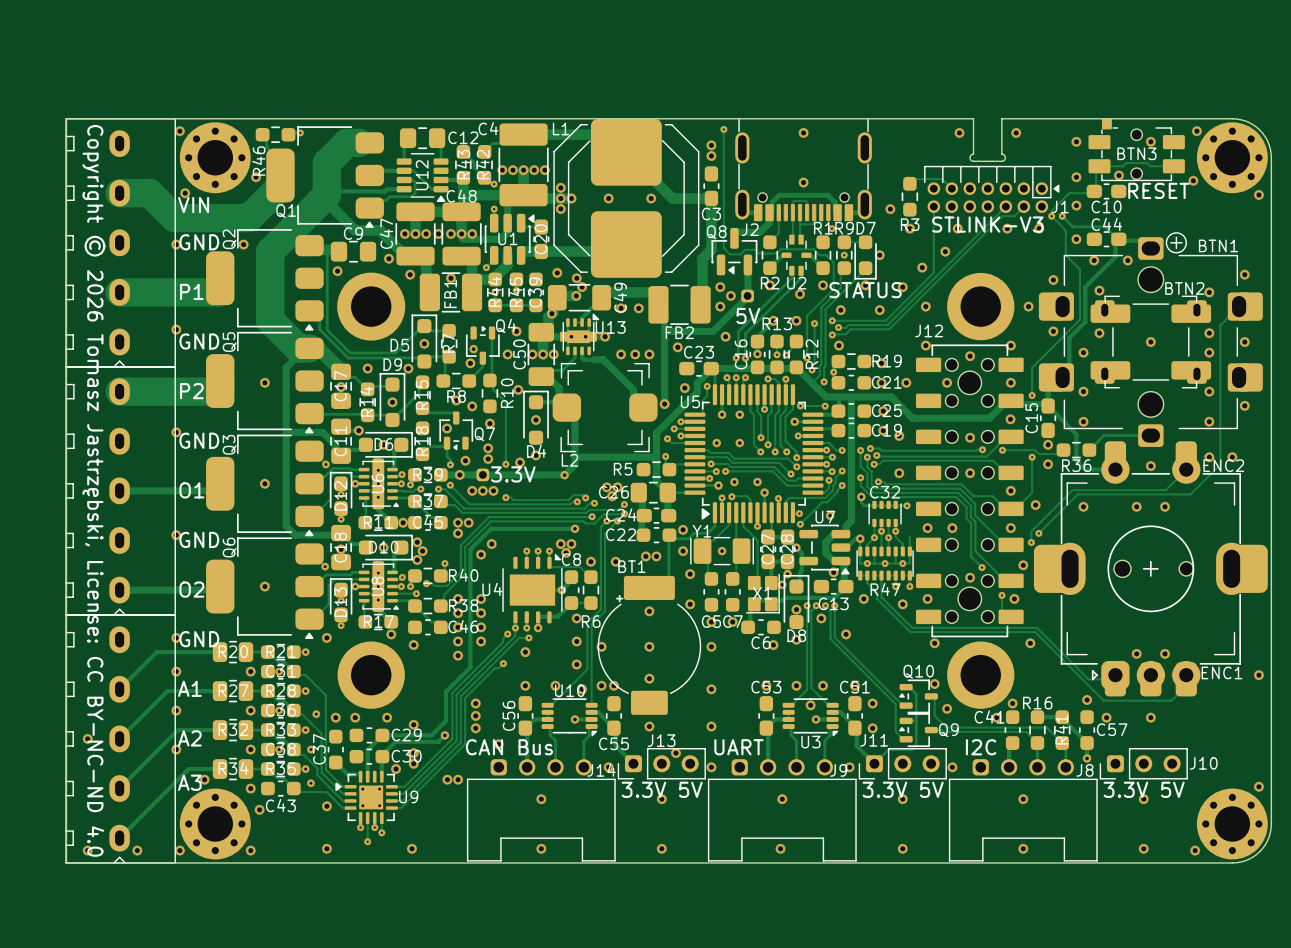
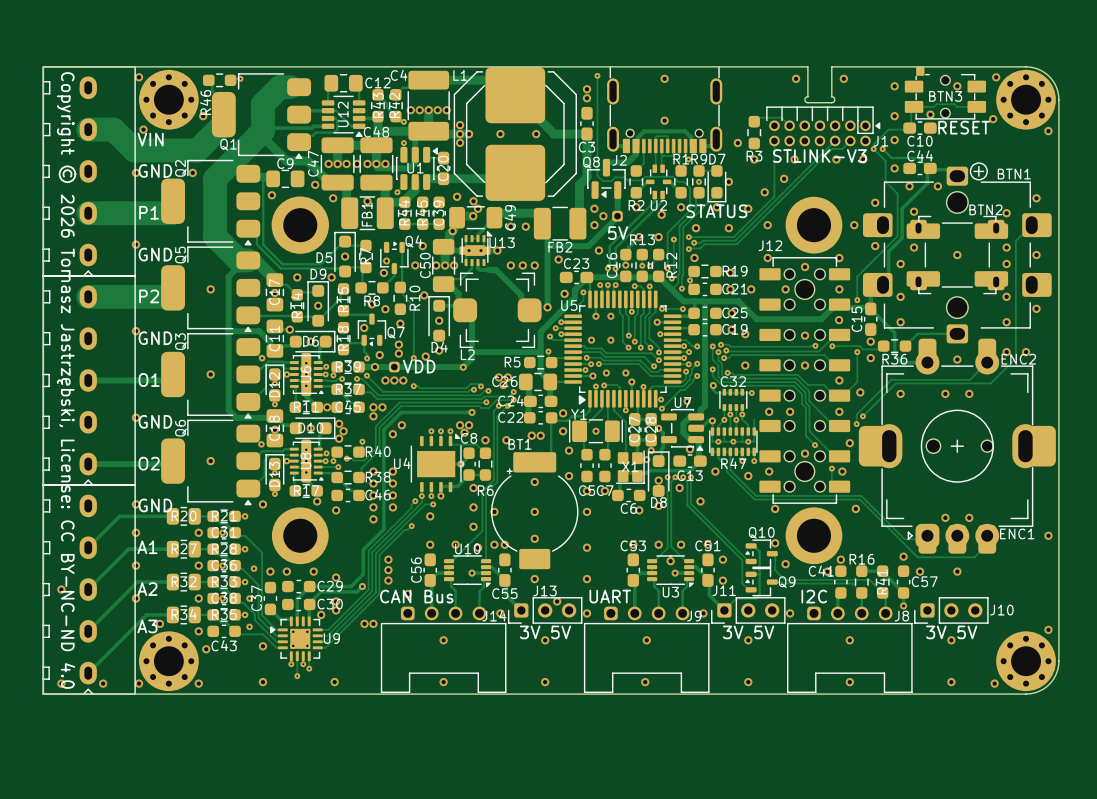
part text: 3.3V (513, 474) -> VDD (419, 366)
J13 text: 3.3V 5V (662, 789) -> 3V 5V (545, 632)
J11 text: 3.3V 5V (903, 789) -> 3V 5V (748, 632)
J10 text: 3.3V 5V (1144, 789) -> 3V 5V (951, 632)

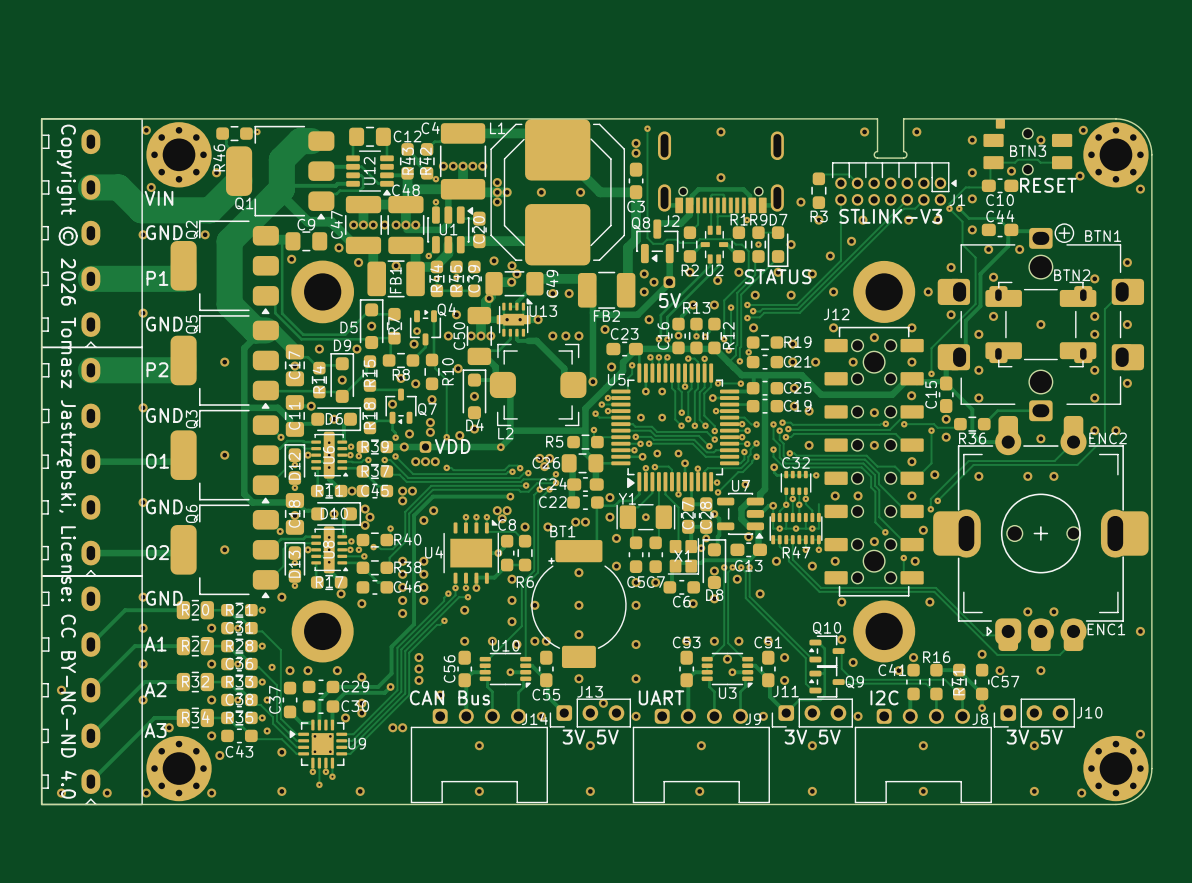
J2 footprint: [607, 66, 723, 154] -> [658, 131, 784, 214]
BTN3 footprint: [904, 66, 987, 120] -> [983, 118, 1073, 175]

